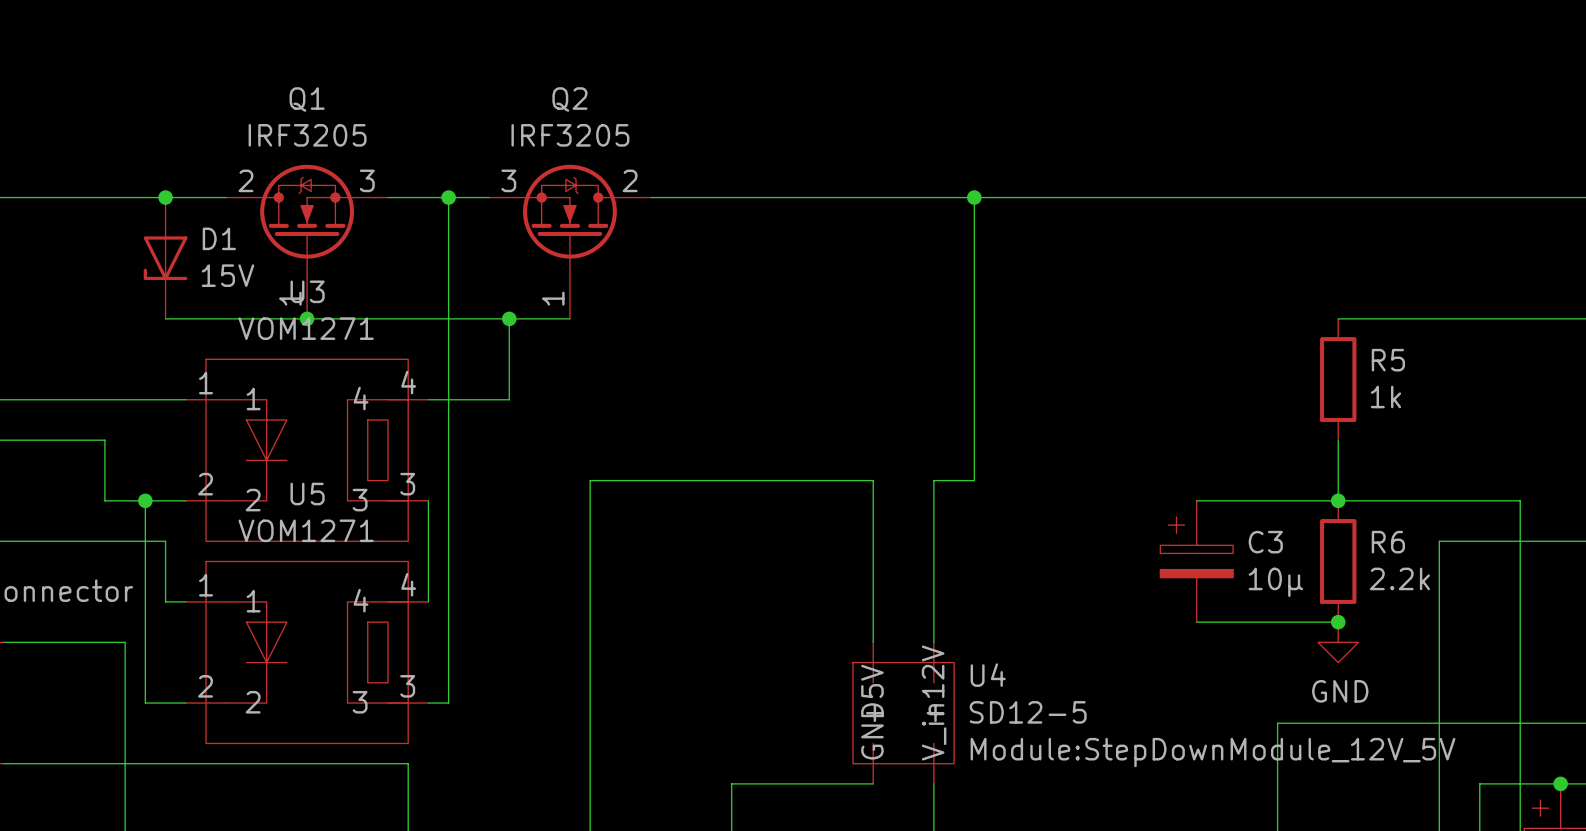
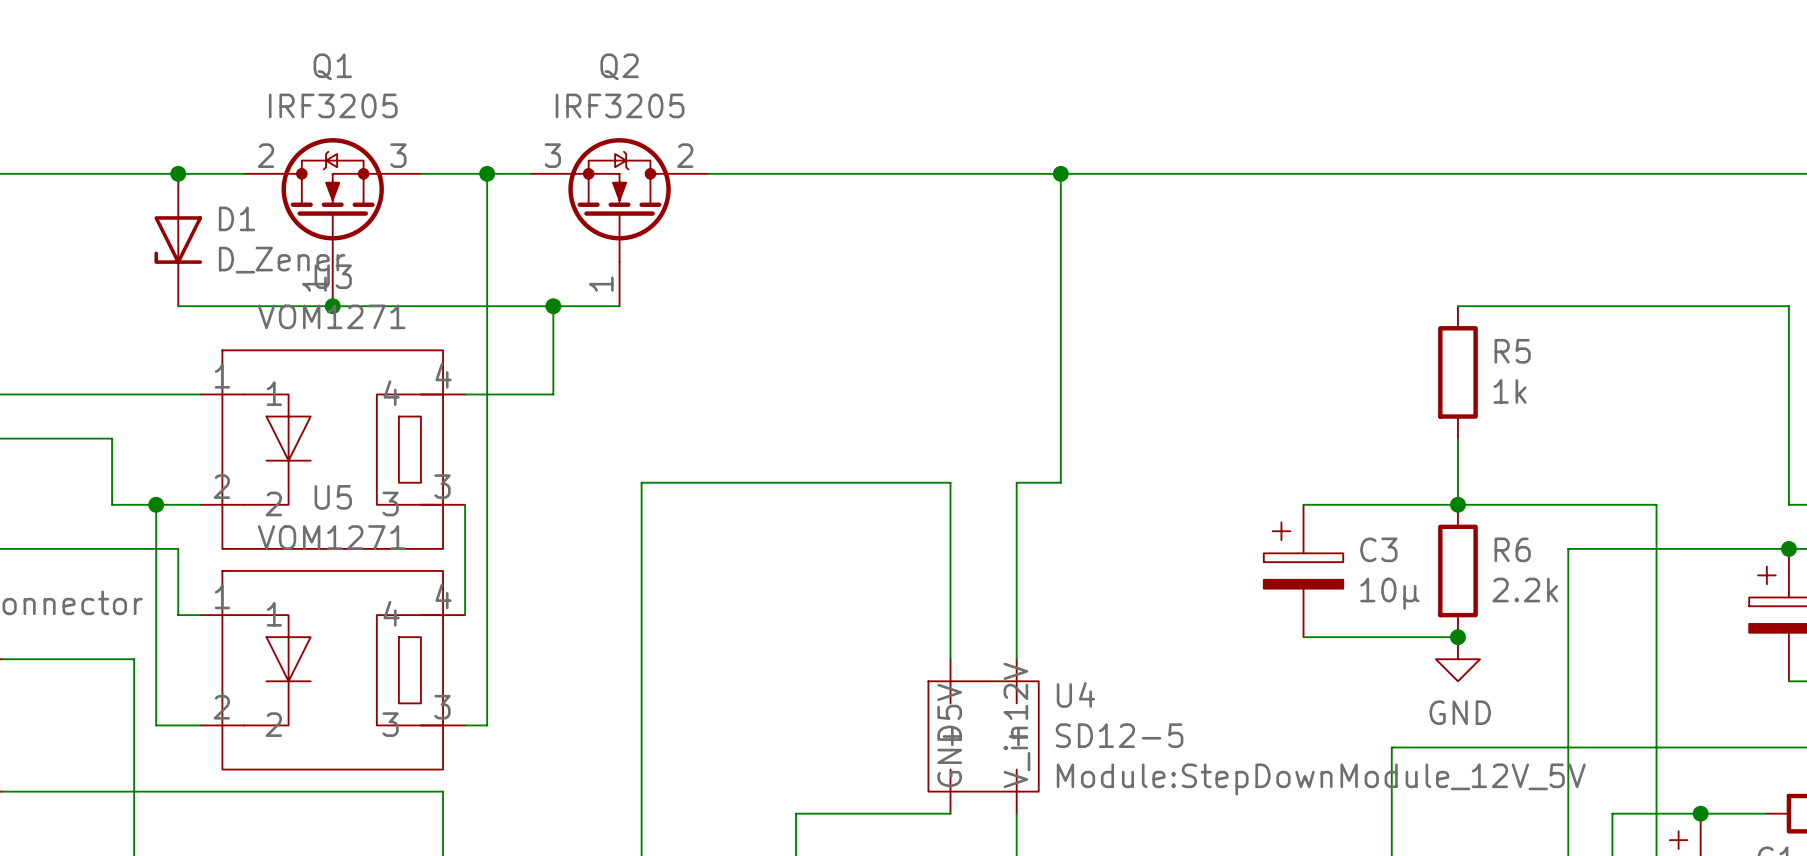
D1 value: 15V (227, 275) -> D_Zener (282, 260)

